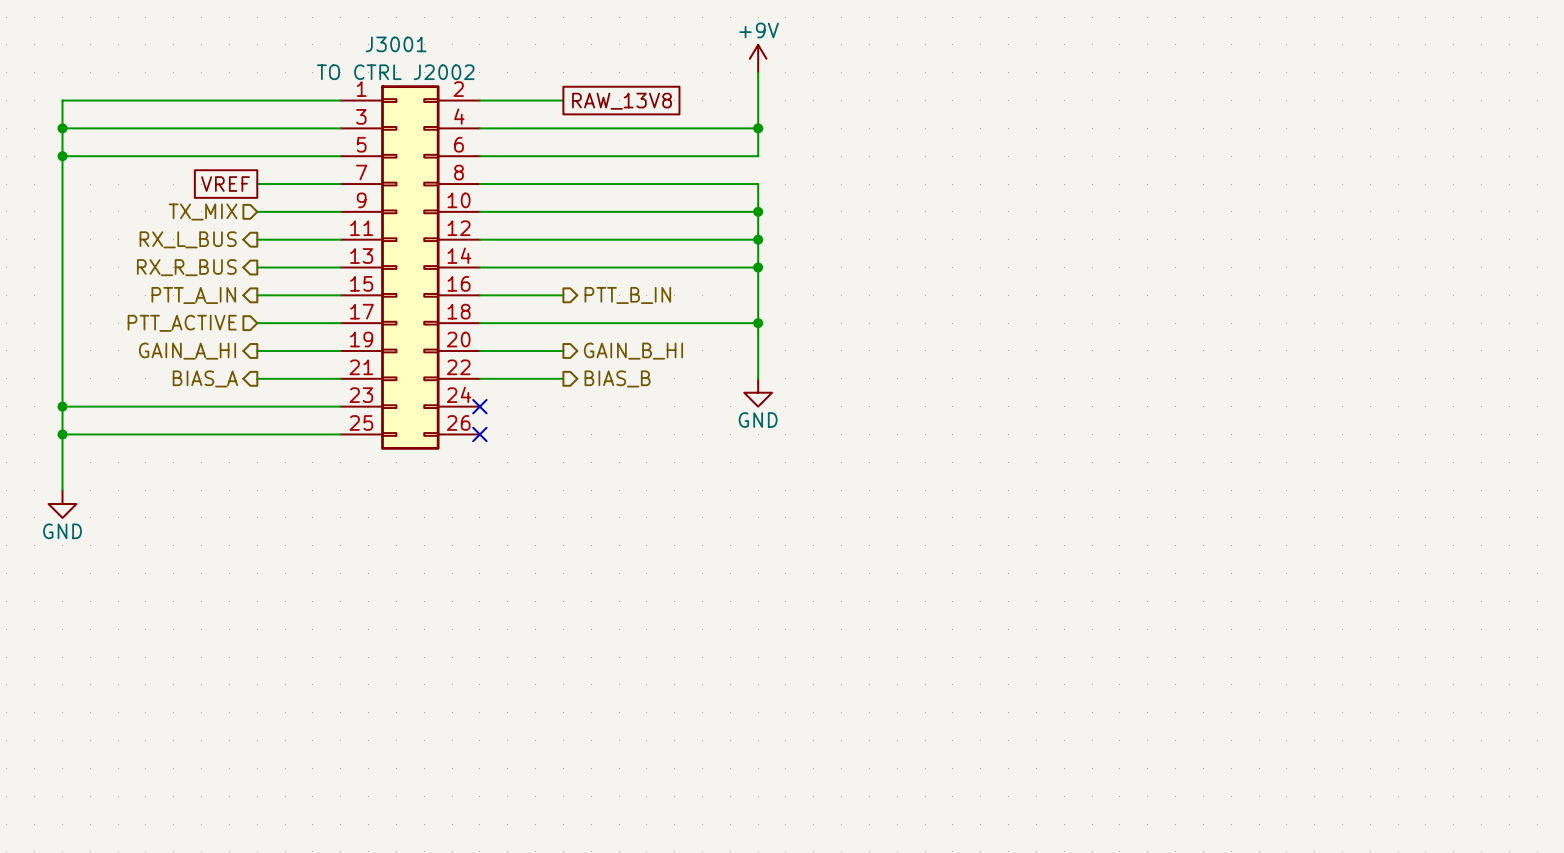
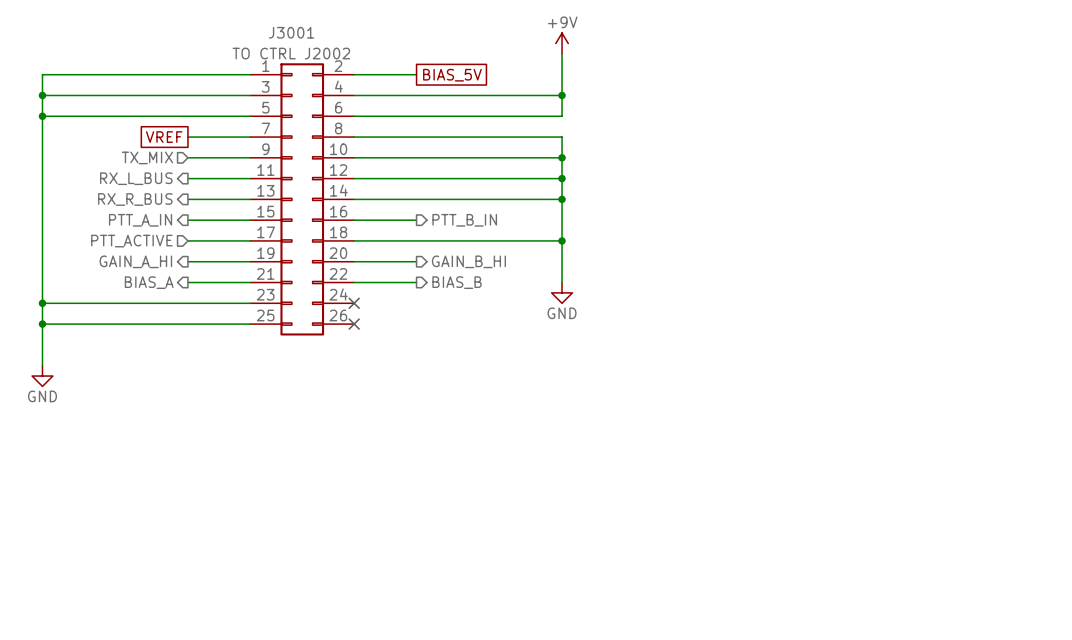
global label: RAW_13V8 (622, 101) -> BIAS_5V (452, 75)

